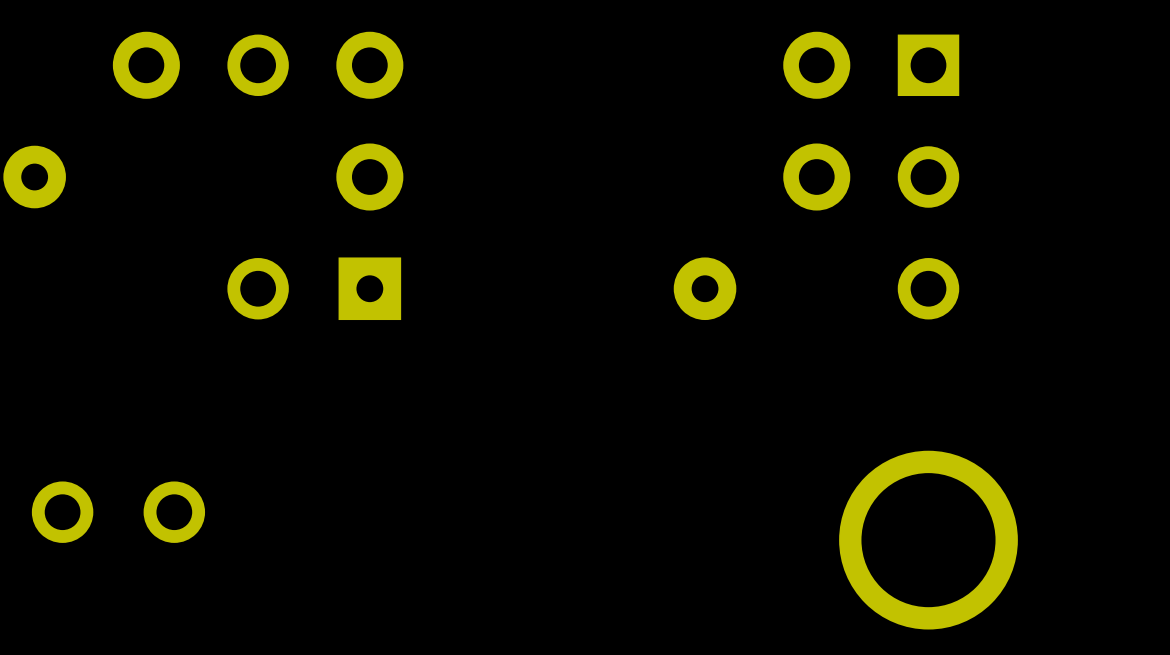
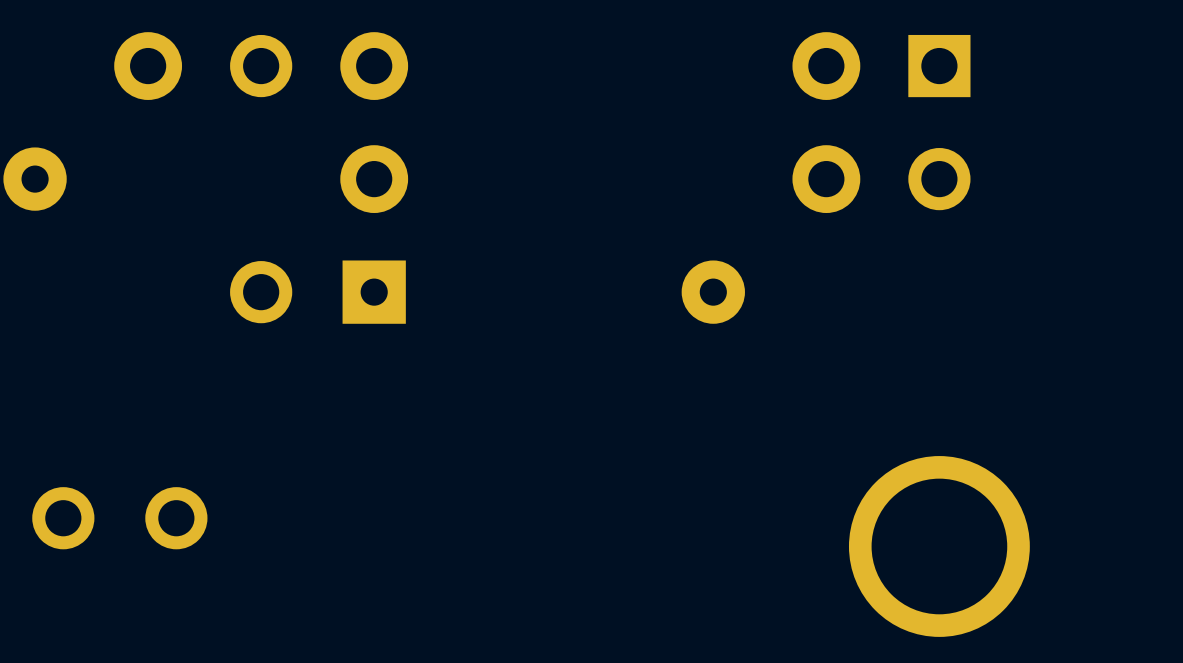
part: (928, 177) -> none

